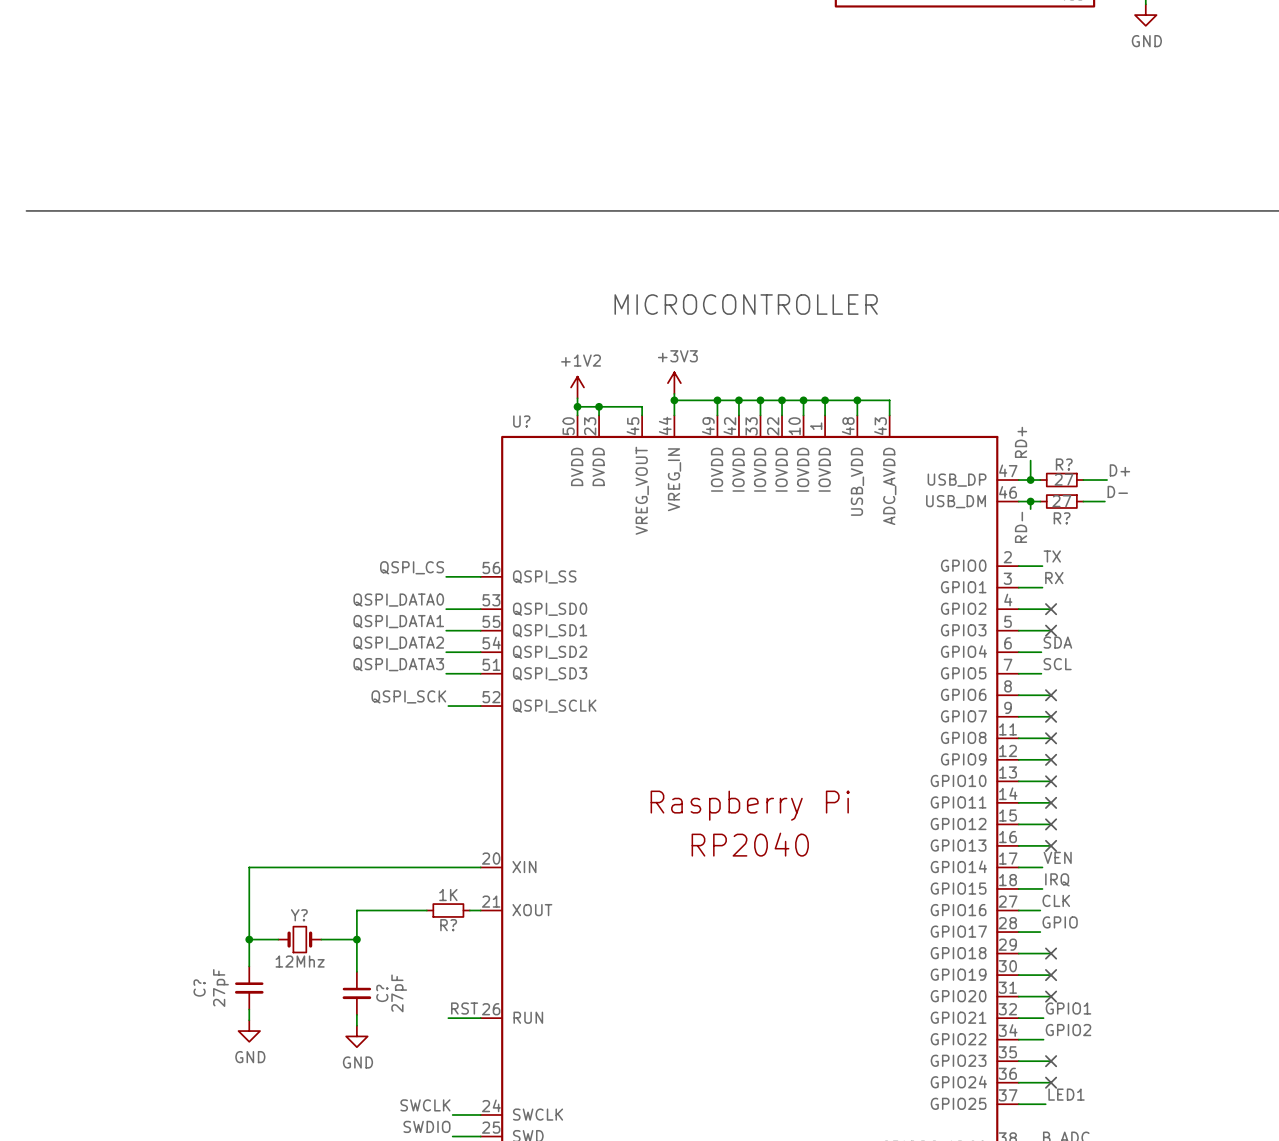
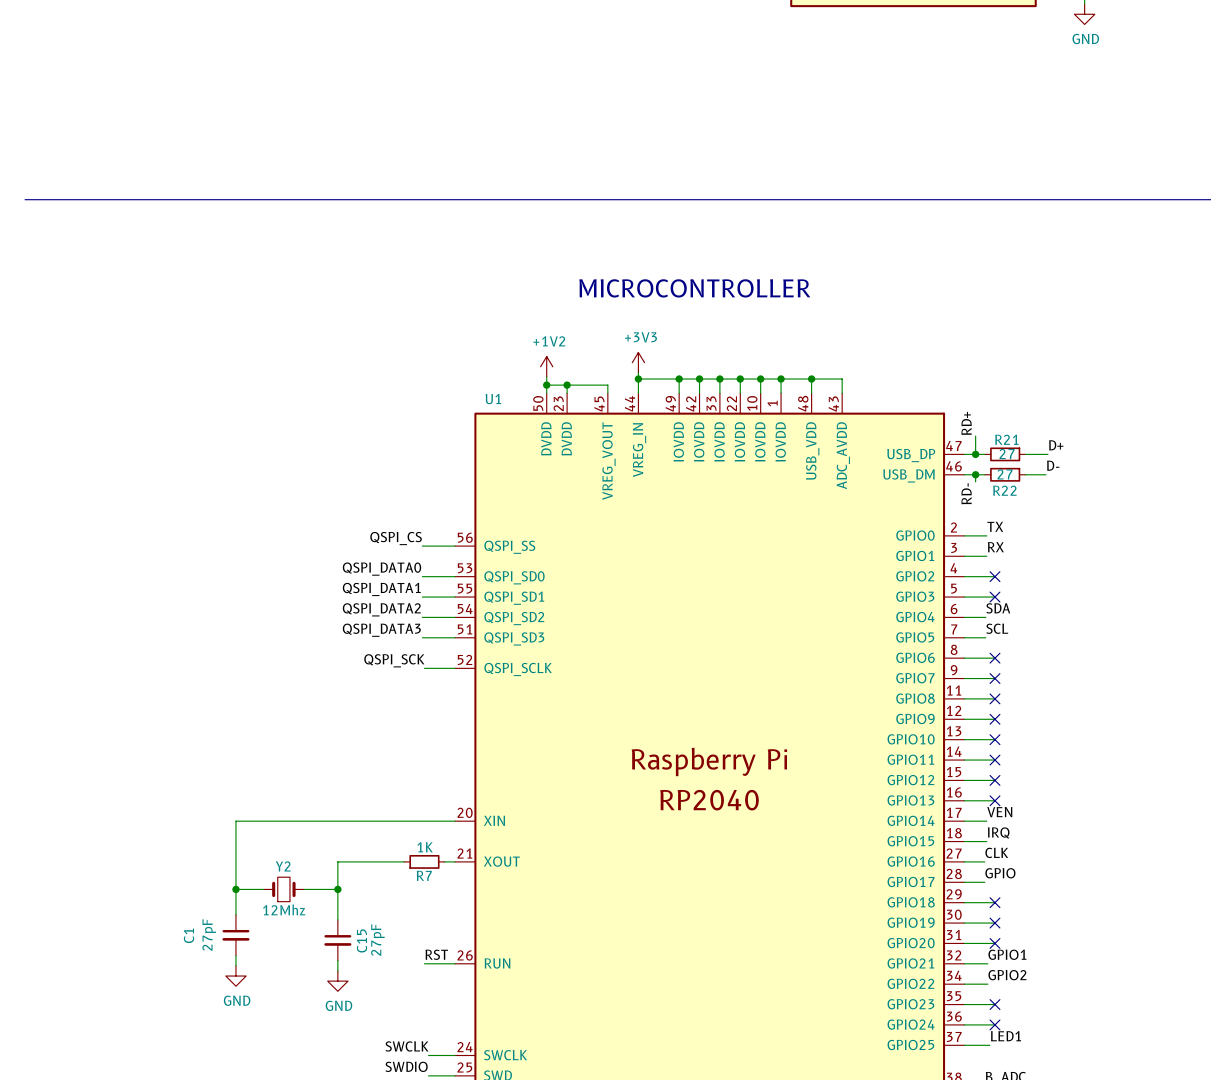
U? name: U? (521, 421) -> U1 (493, 399)
R? name: R? (1064, 464) -> R21 (1006, 439)
R? name: R? (1062, 518) -> R22 (1004, 490)
Y? name: Y? (299, 915) -> Y2 (283, 866)
R? name: R? (448, 925) -> R7 (424, 875)
C? name: C? (199, 987) -> C1 (188, 935)
C? name: C? (382, 993) -> C15 (361, 940)

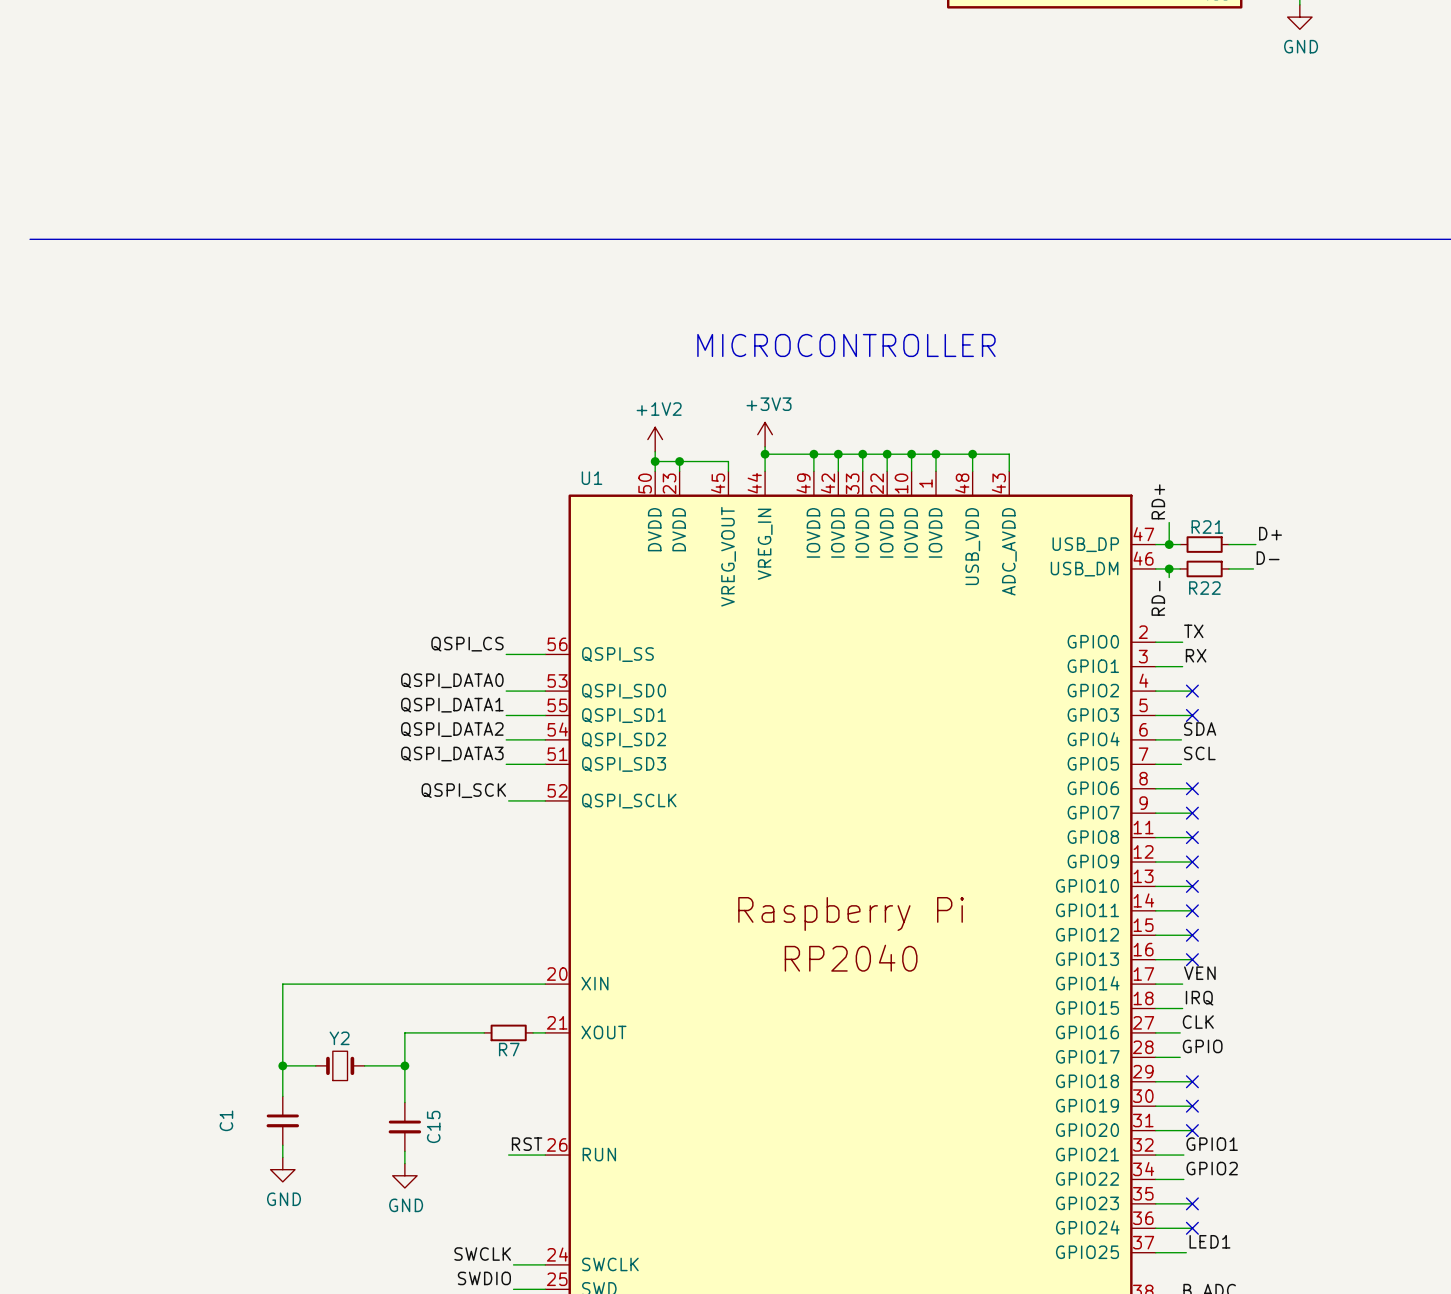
R21 value: 27 (1007, 454) -> none
R22 value: 27 (1005, 474) -> none
R7 value: 1K (425, 847) -> none
Y2 value: 12Mhz (284, 909) -> none
C1 value: 27pF (209, 934) -> none
C15 value: 27pF (377, 940) -> none

